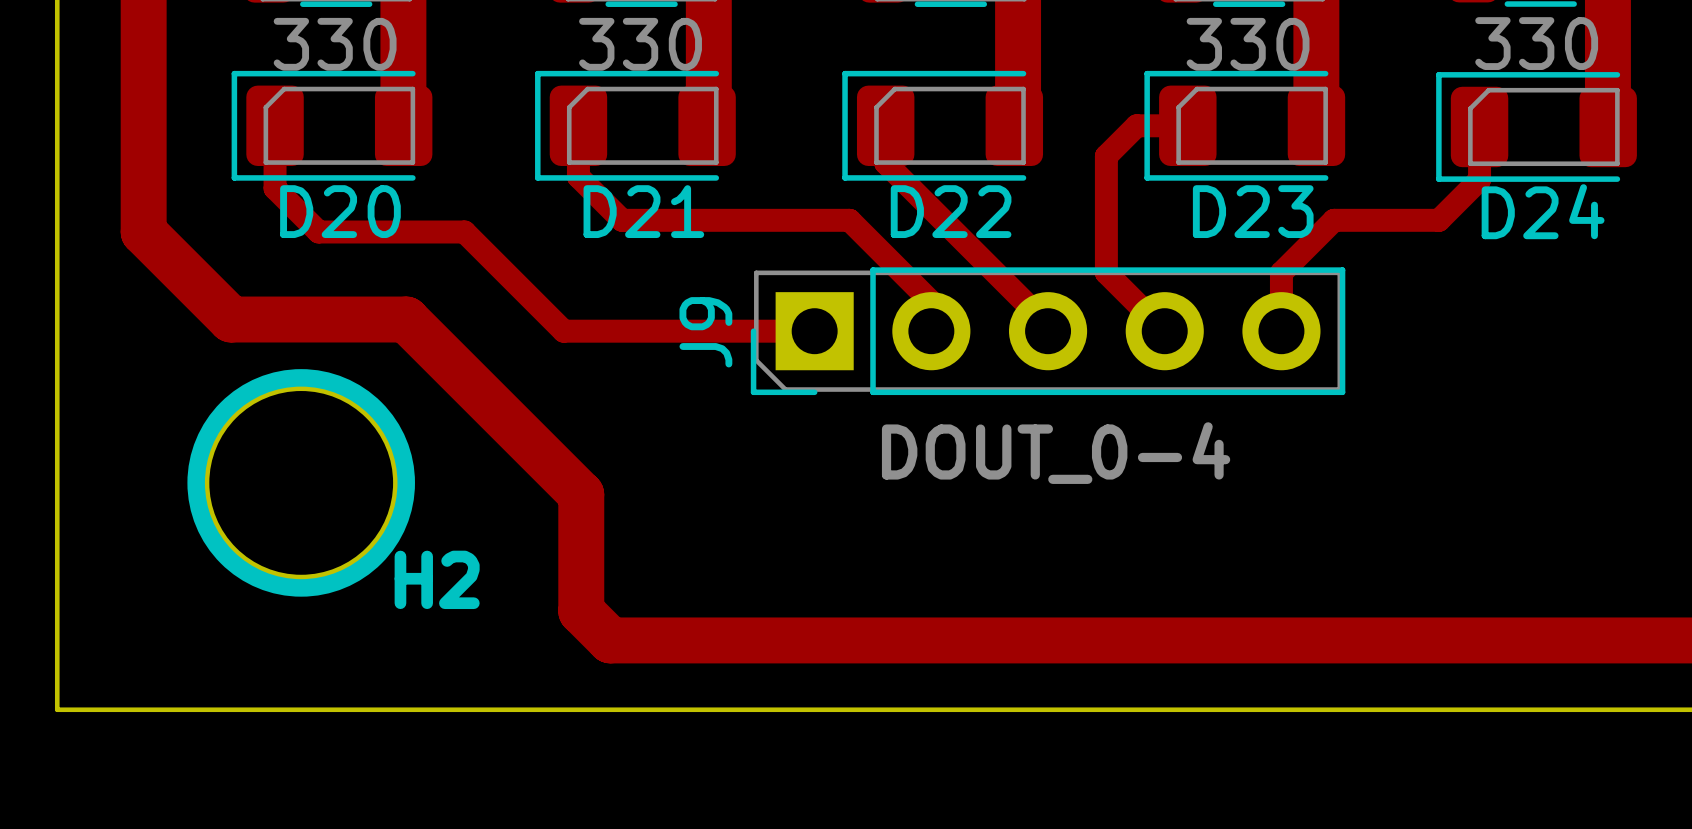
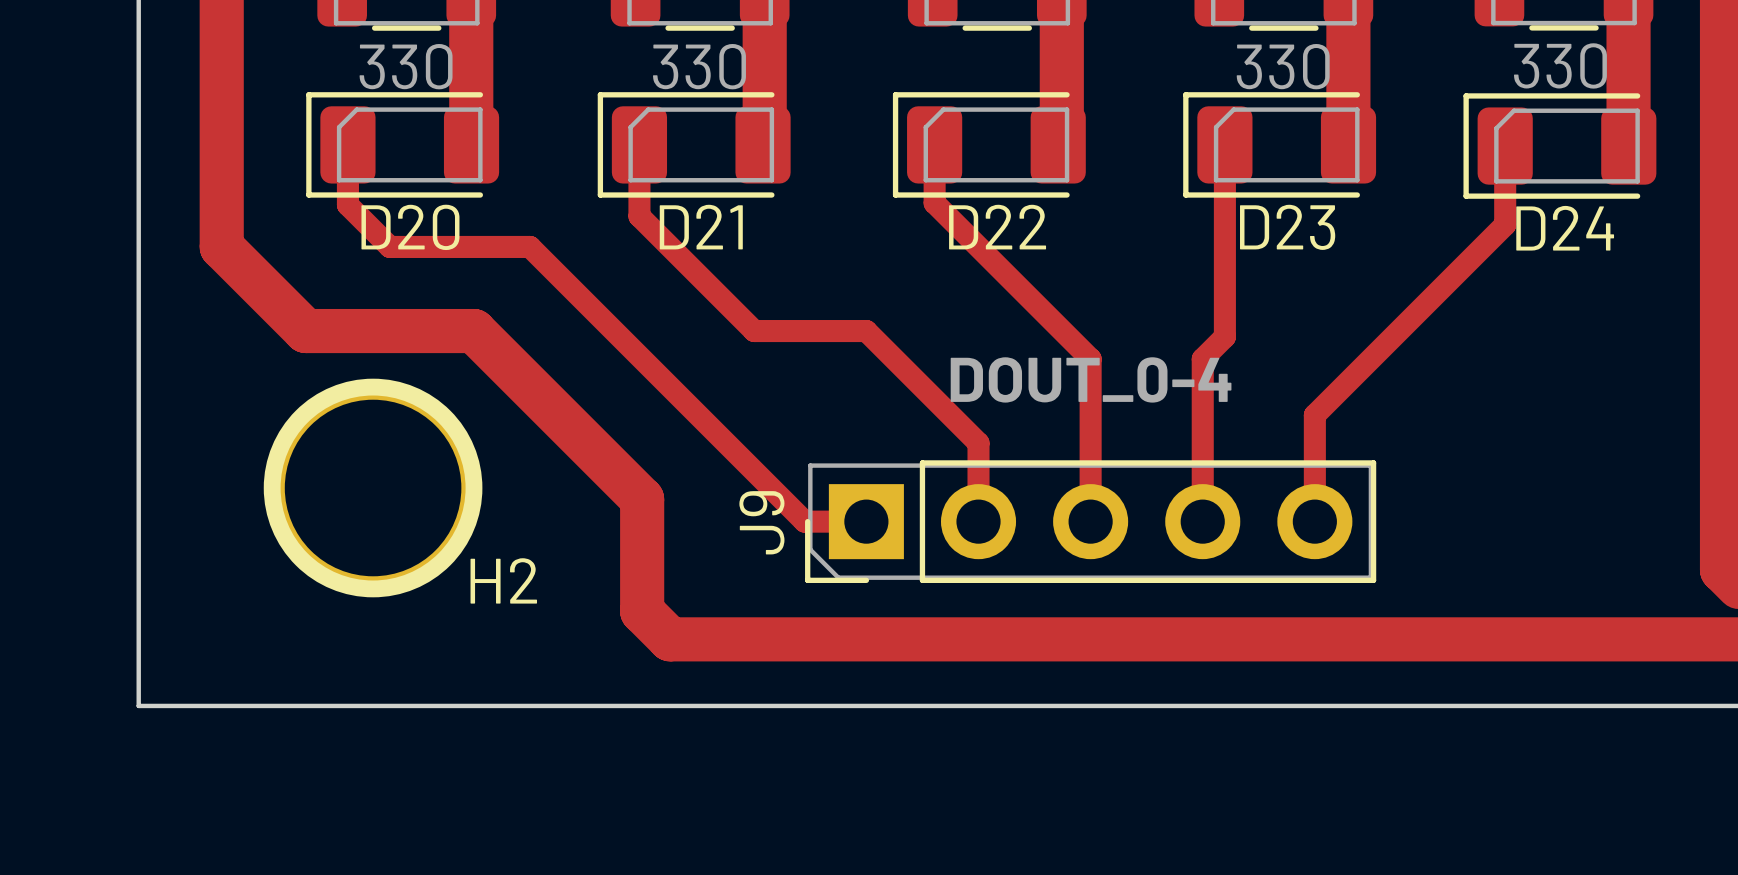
track: (1187, 125) (1136, 125) (1106, 156) (1106, 272) (1164, 331) -> none
track: none -> (1224, 168) (1224, 336) (1202, 359) (1202, 521)
track: (885, 162) (1048, 325) (1048, 331) -> (934, 180) (934, 203) (1090, 359) (1090, 521)
track: (578, 176) (622, 220) (849, 220) (931, 302) (931, 331) -> (639, 193) (639, 216) (754, 331) (866, 331) (978, 443) (978, 521)
track: (1479, 179) (1438, 220) (1333, 220) (1281, 272) (1281, 331) -> (1505, 196) (1505, 224) (1314, 415) (1314, 521)
track: (563, 331) (814, 331) -> (625, 342) (804, 521) (866, 521)
J9 position: (1048, 331) -> (1090, 521)
J9 value position: DOUT_0-4 (1056, 453) -> DOUT_0-4 (1091, 379)

